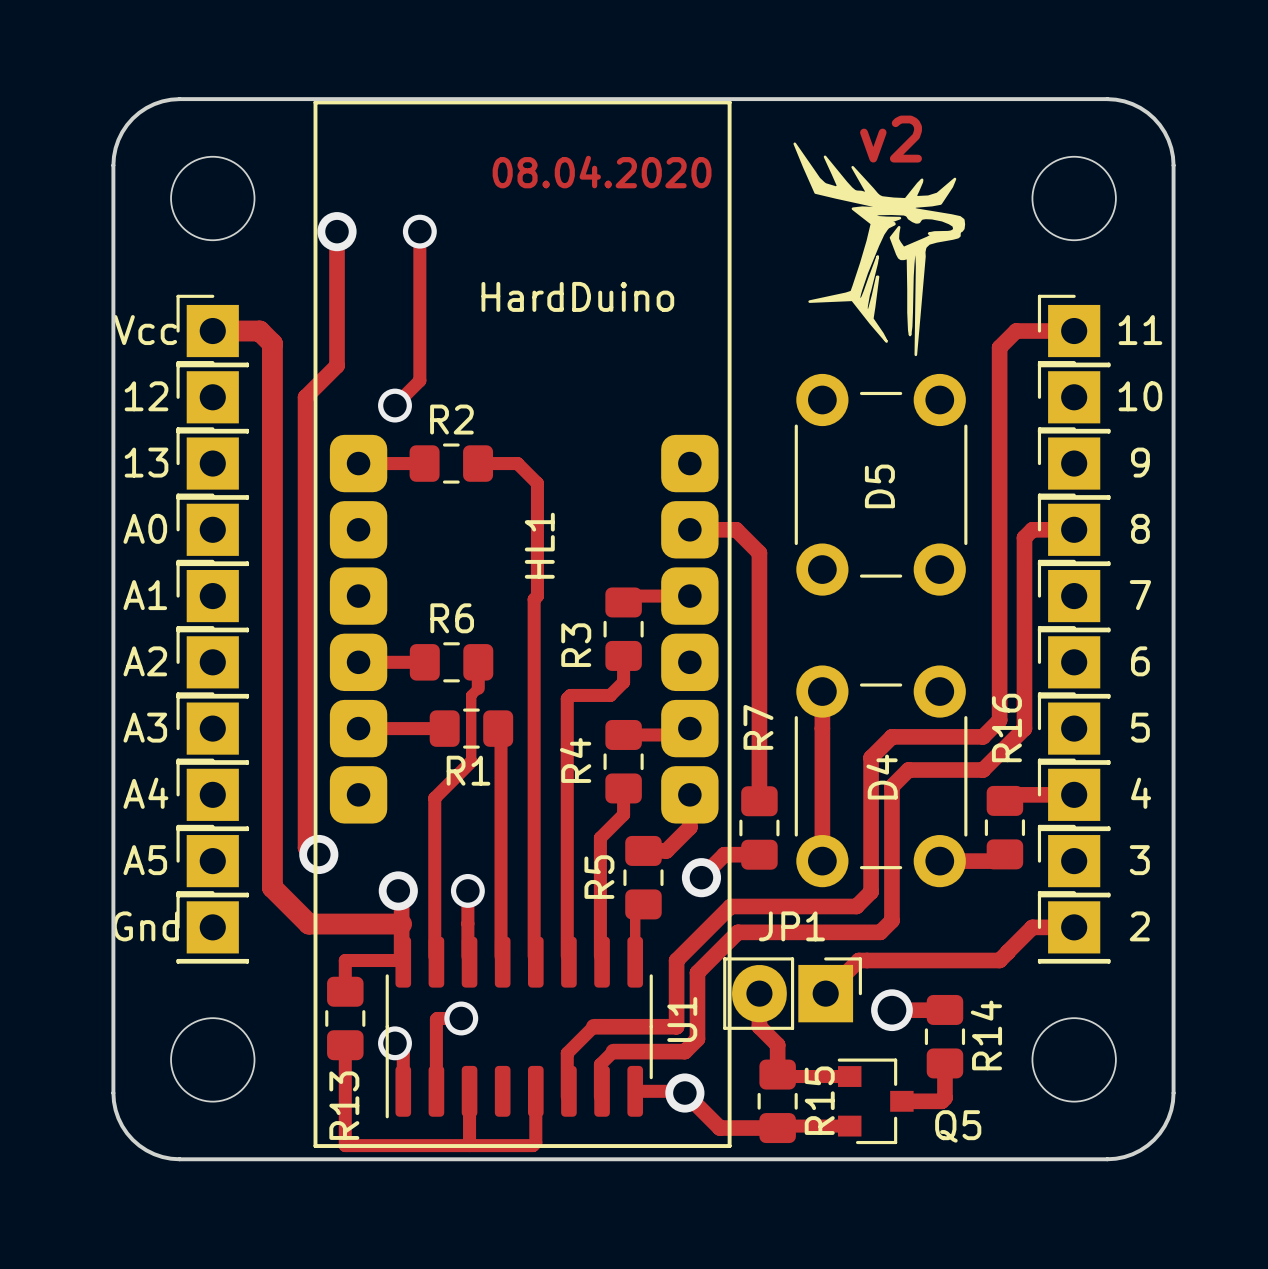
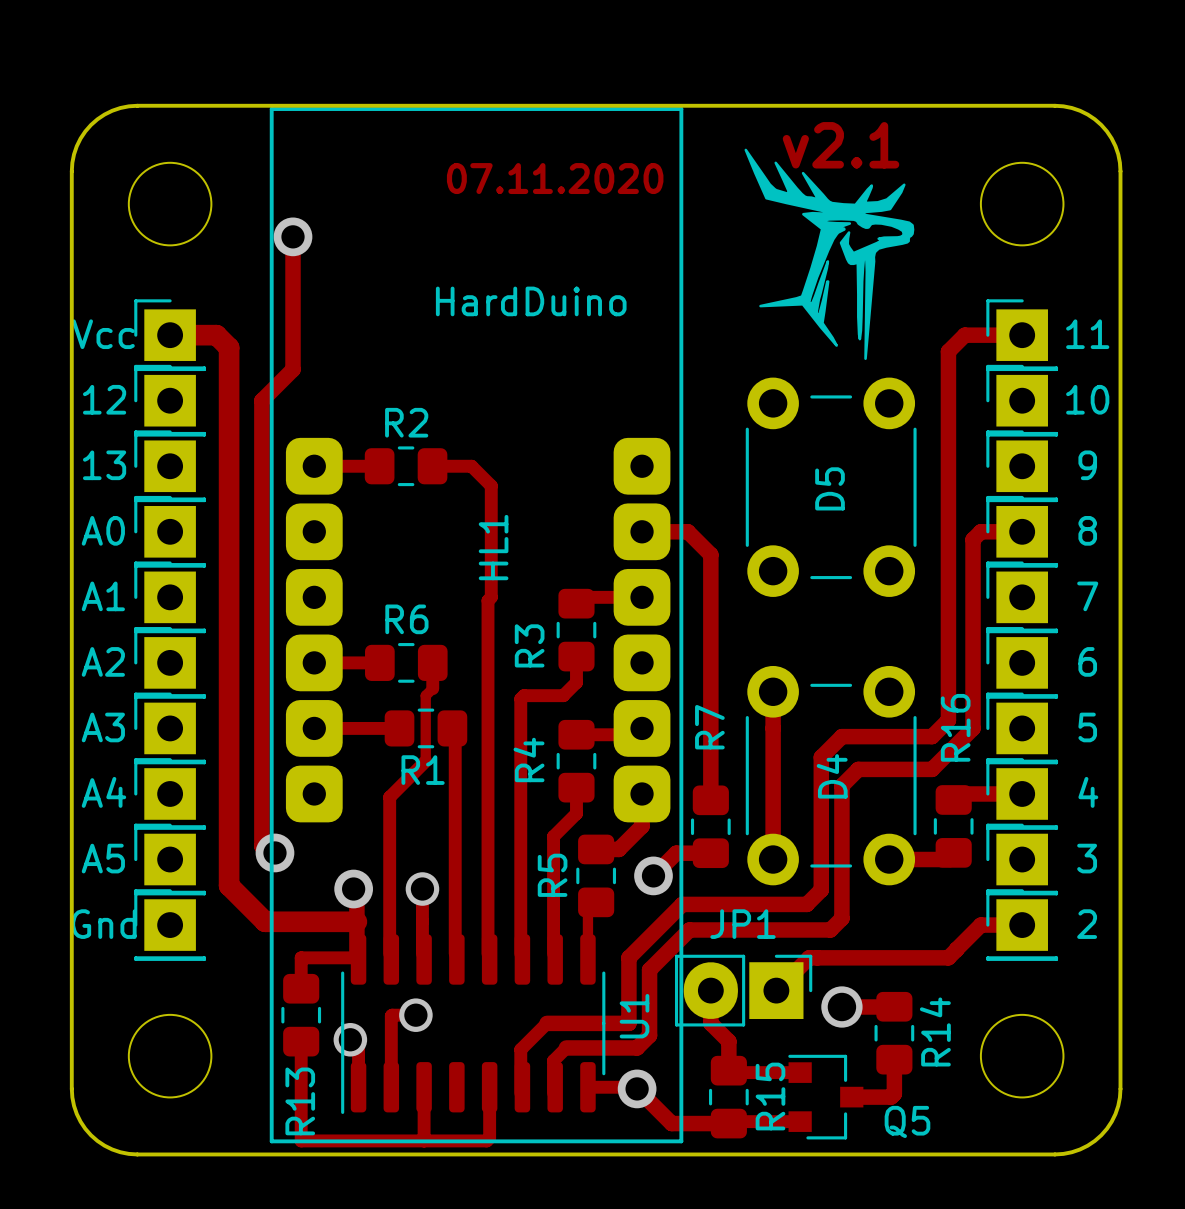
text: v2 (891, 139) -> v2.1 (841, 145)
text: 08.04.2020 (602, 172) -> 07.11.2020 (555, 178)
track: (419, 231) (419, 380) (395, 405) -> none
via: (419, 231) -> none
via: (395, 405) -> none

